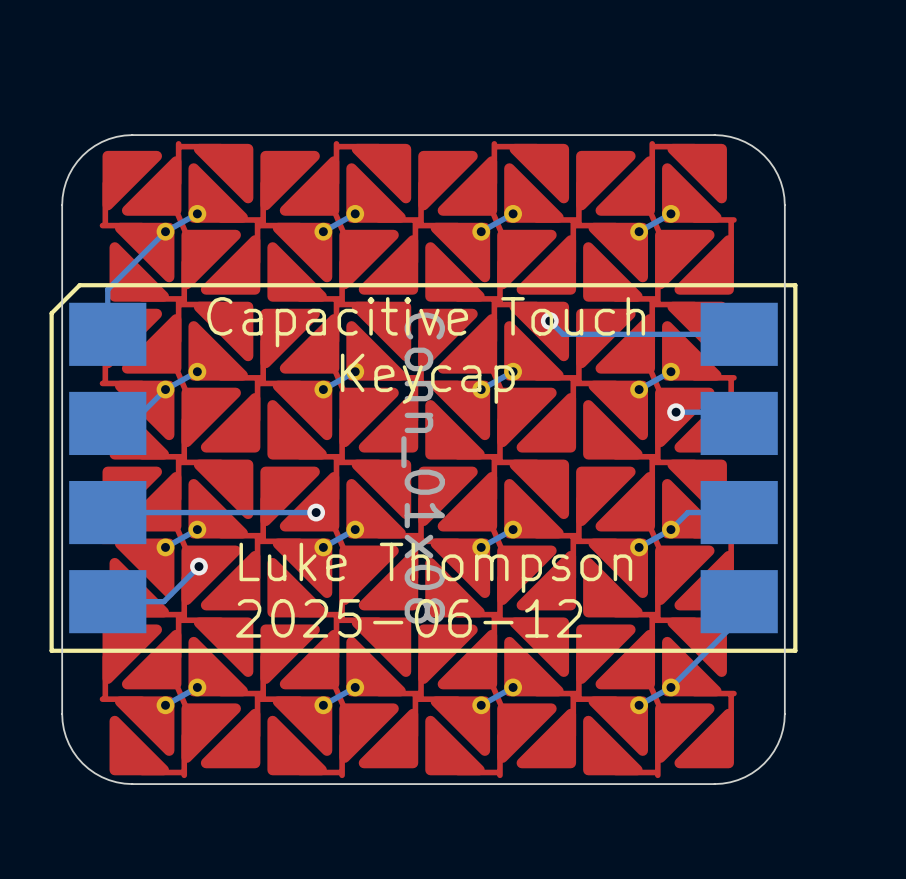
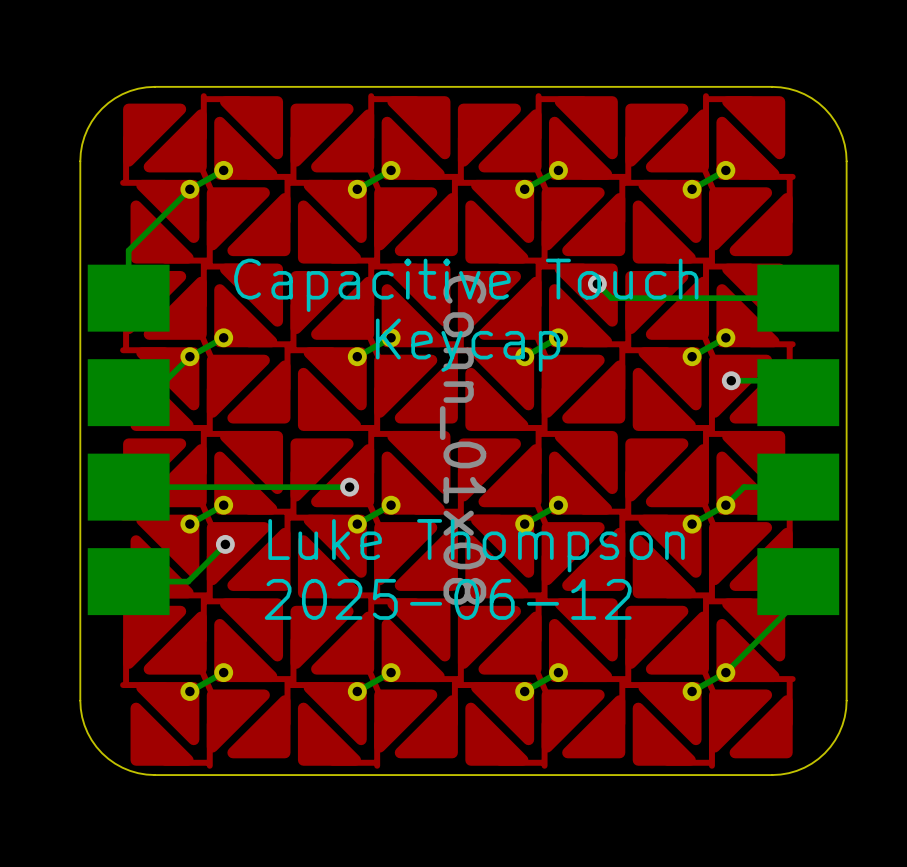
part footprint: [49, 283, 798, 653] -> [87, 264, 840, 616]

